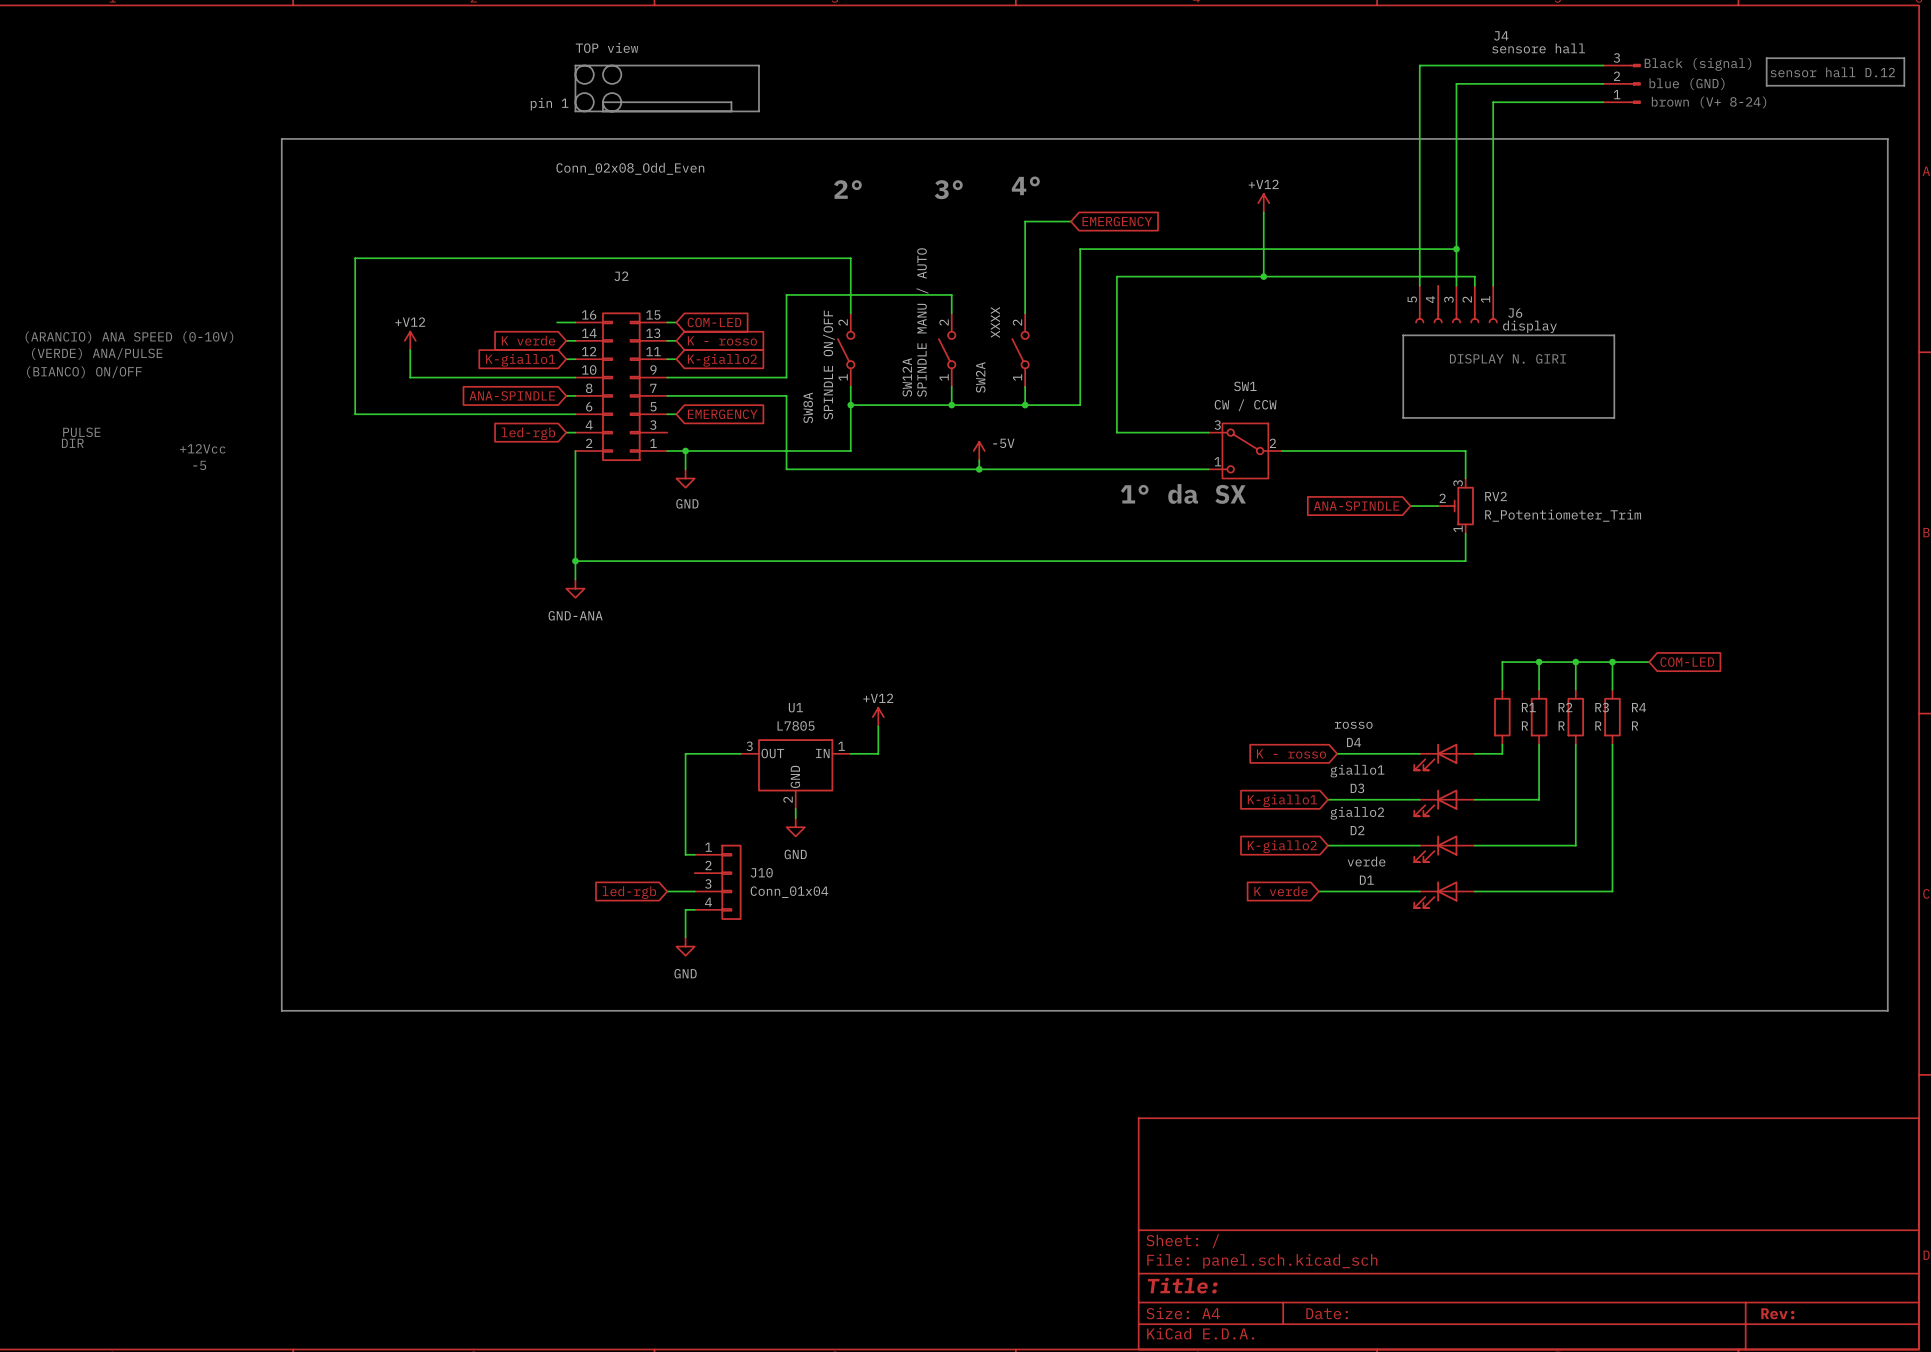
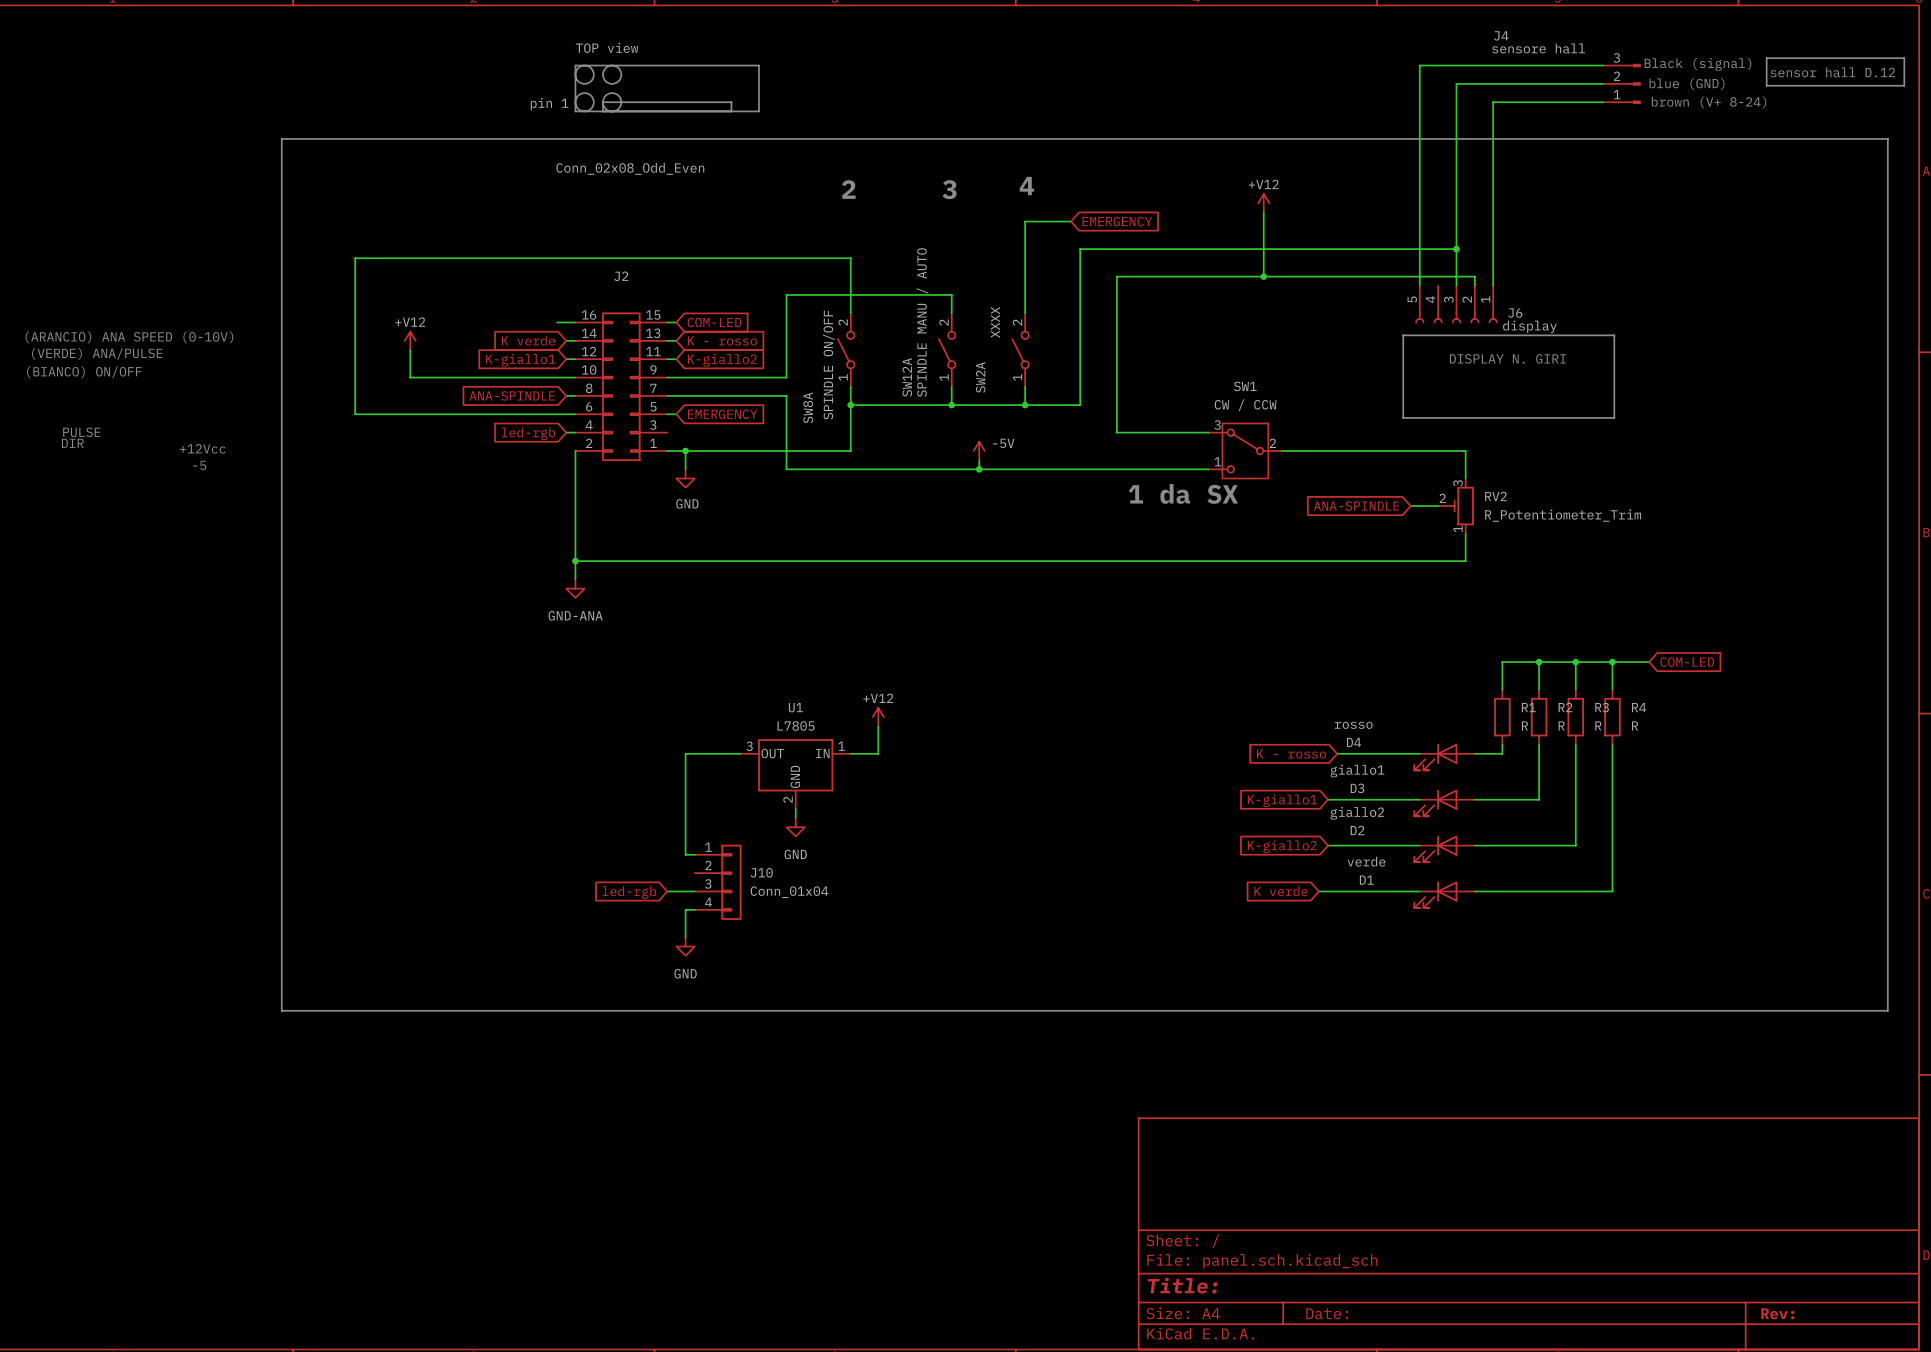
text: 4° (1025, 185) -> 4 (1026, 186)
text: 2° (847, 189) -> 2 (848, 189)
text: 3° (948, 189) -> 3 (949, 189)
text: 1° da SX (1183, 493) -> 1 da SX (1183, 493)

